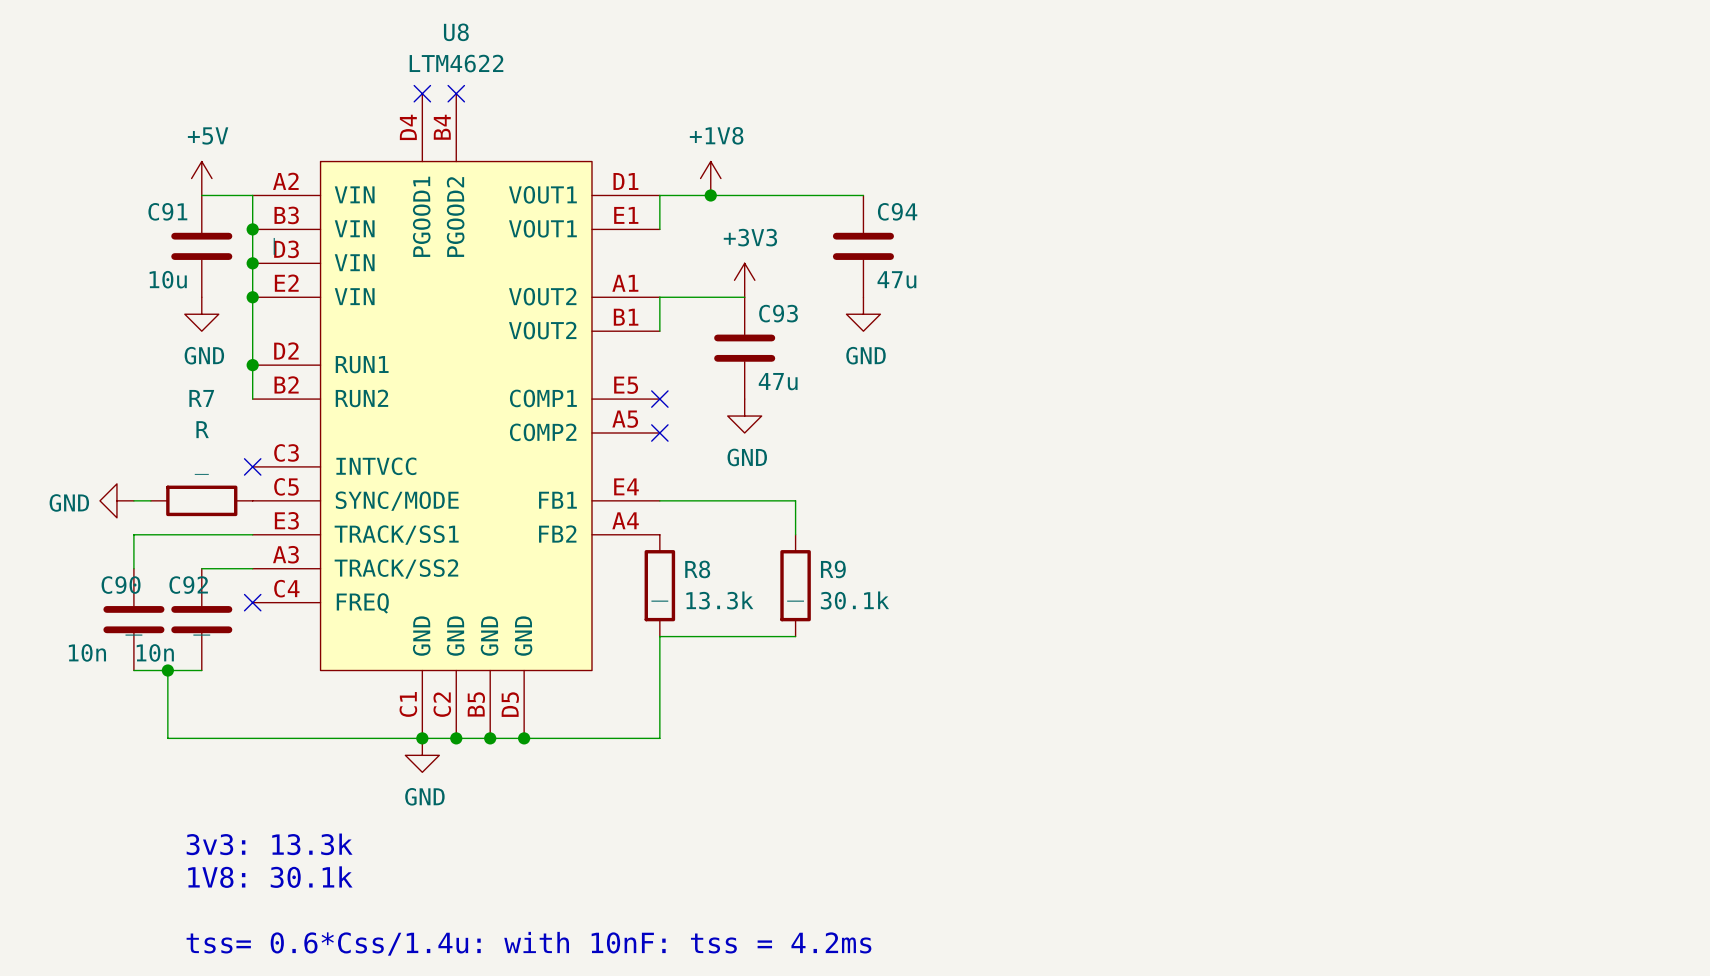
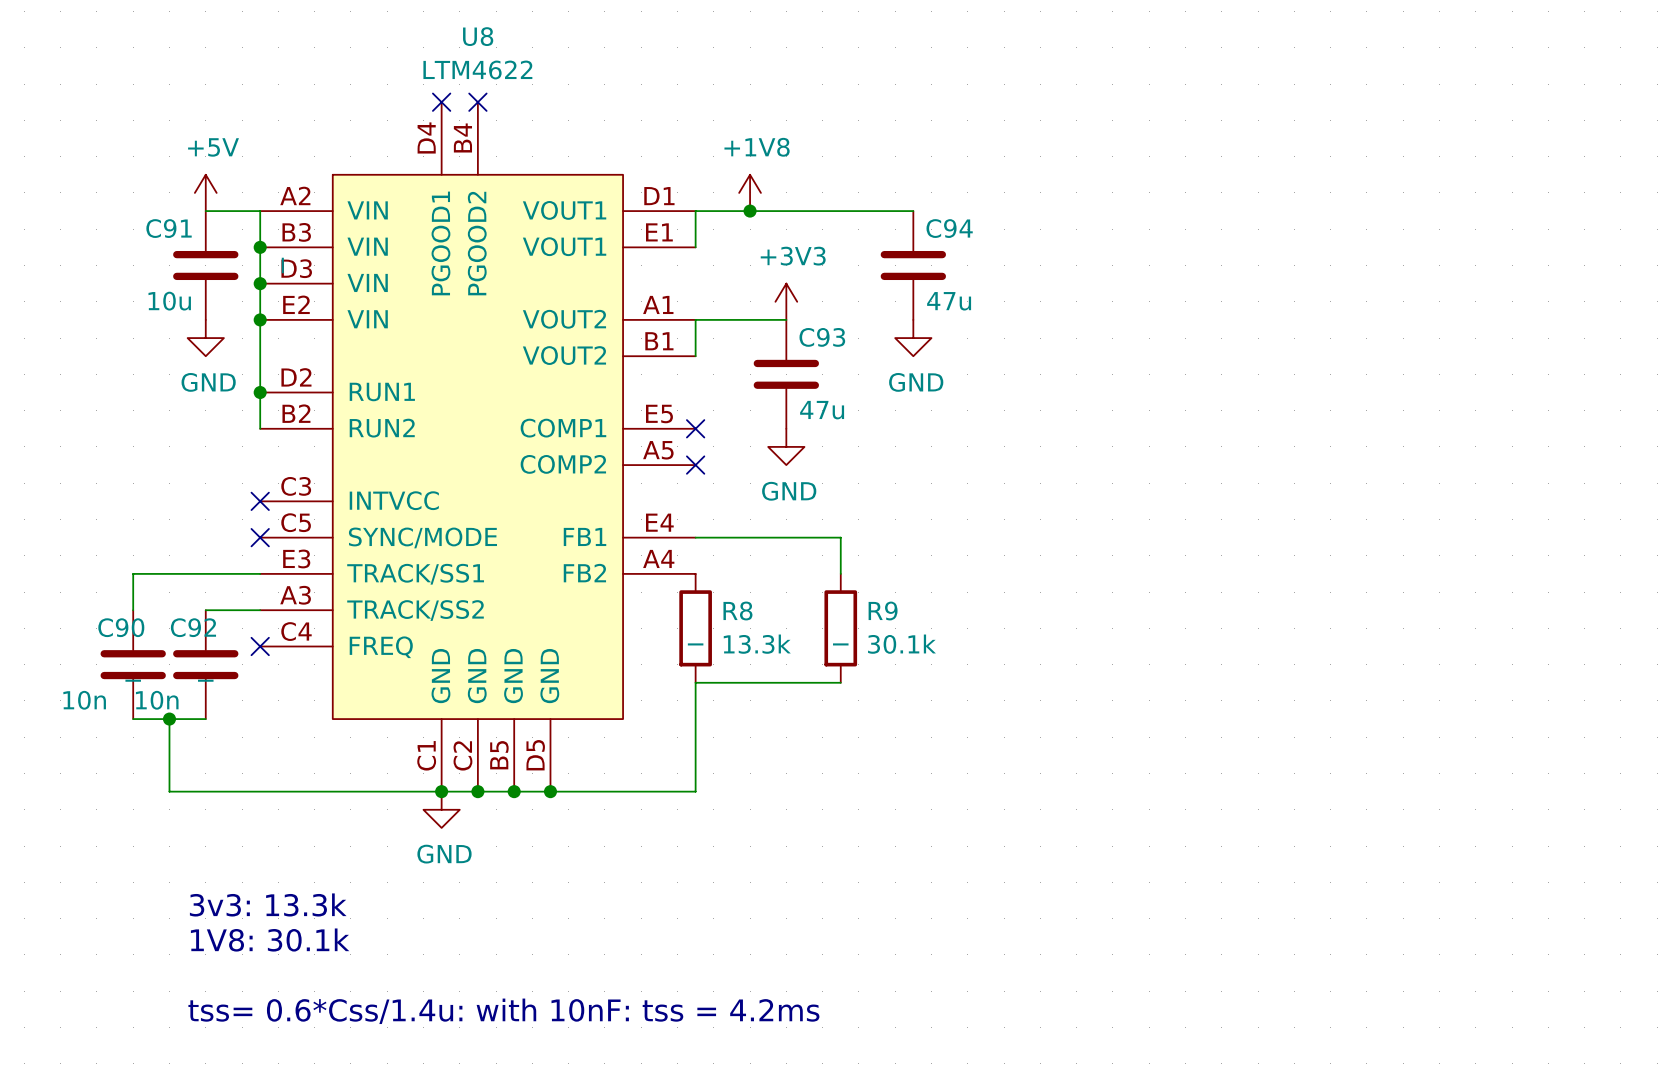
power symbol: GND (116, 500) -> none
wire: (133, 500) (150, 500) -> none
R7: R (201, 500) -> none
no-connect mark: none -> (260, 537)

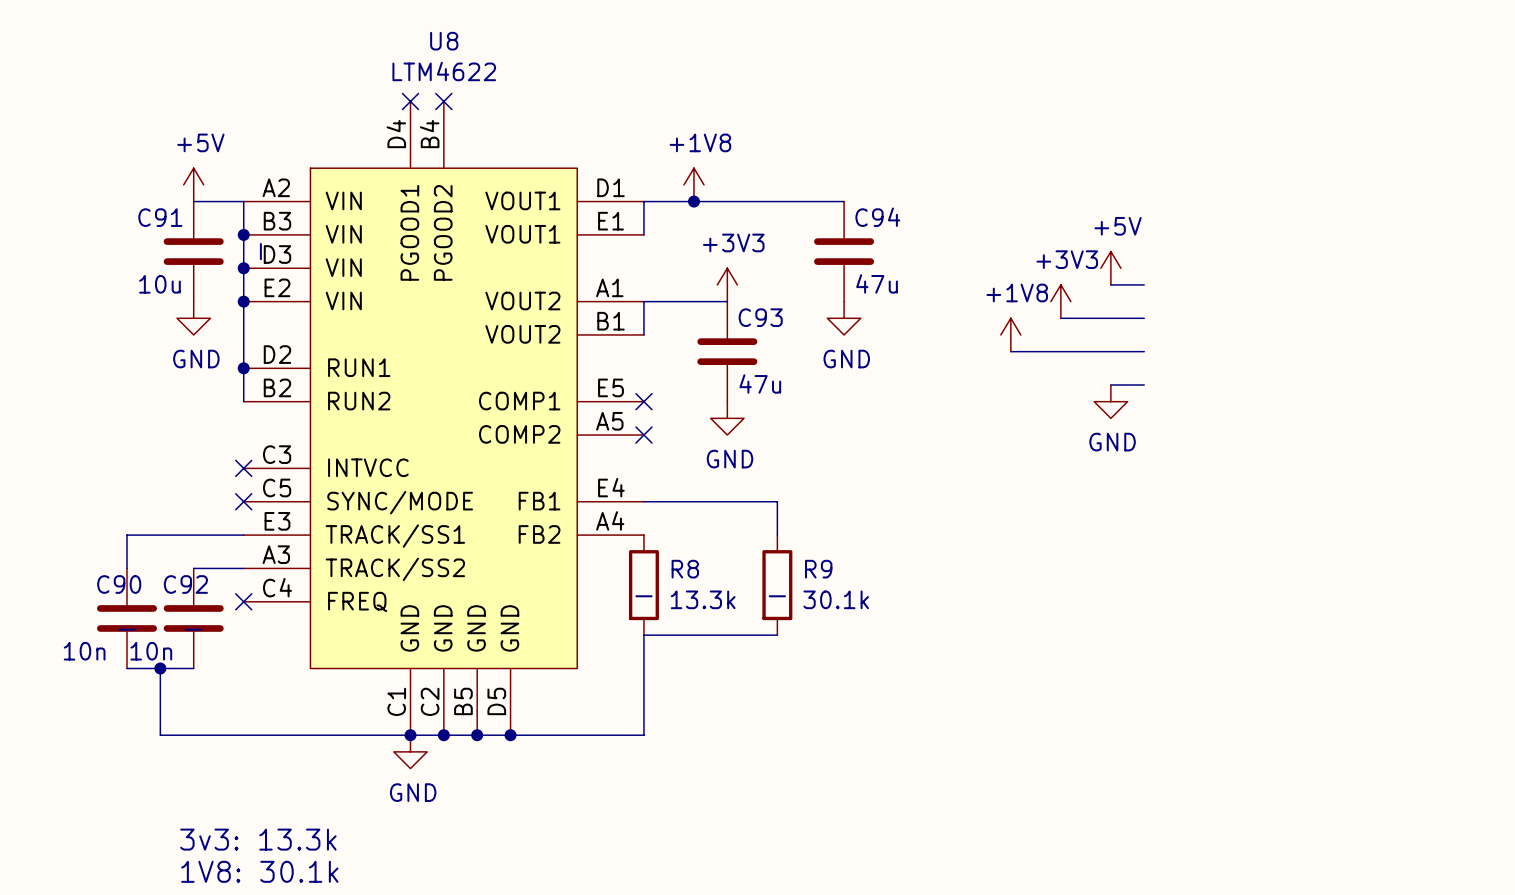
power symbol: none -> +5V (1110, 268)
wire: none -> (1110, 284) (1144, 284)
power symbol: none -> +3V3 (1060, 301)
wire: none -> (1060, 318) (1144, 318)
power symbol: none -> +1V8 (1010, 334)
wire: none -> (1010, 351) (1144, 351)
wire: none -> (1110, 385) (1144, 385)
power symbol: none -> GND (1110, 401)

